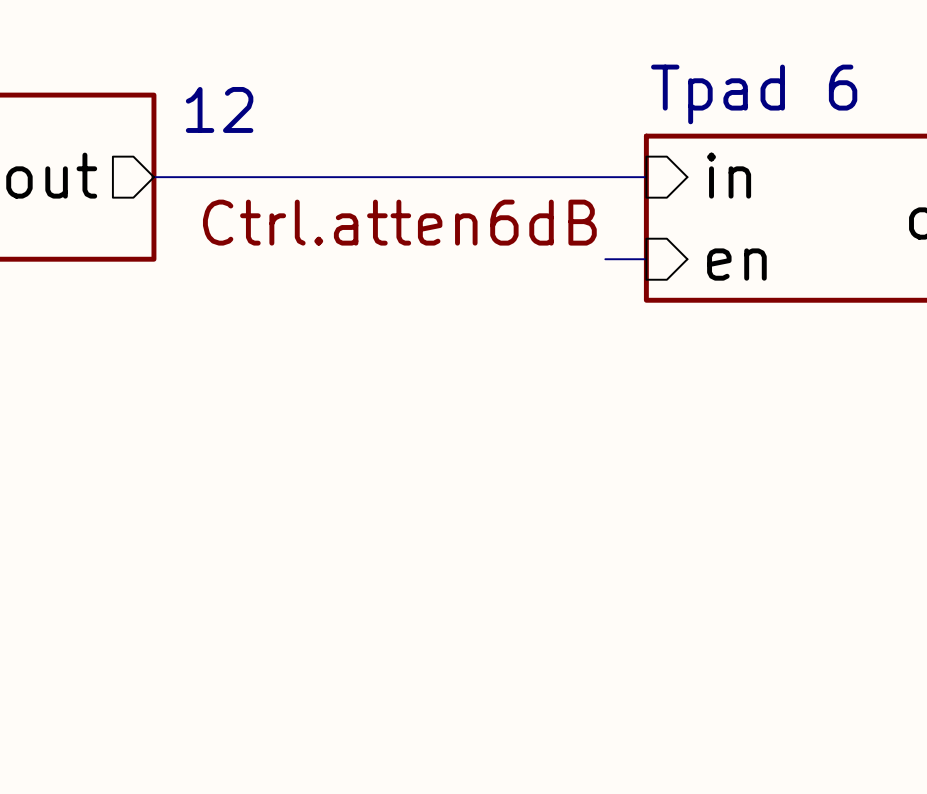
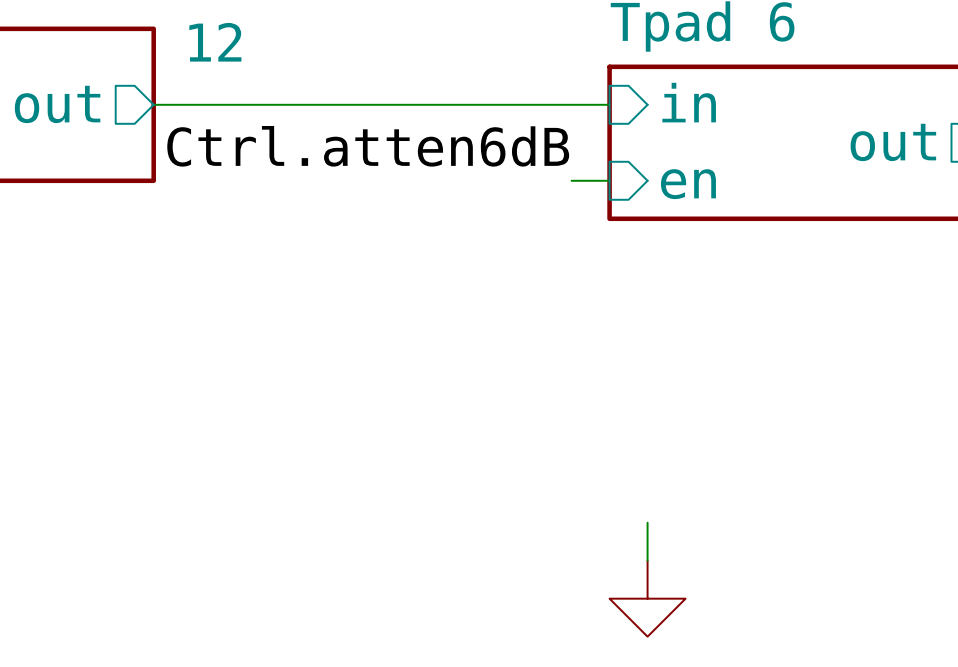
wire: none -> (647, 522) (647, 560)
power symbol: none -> (647, 598)

